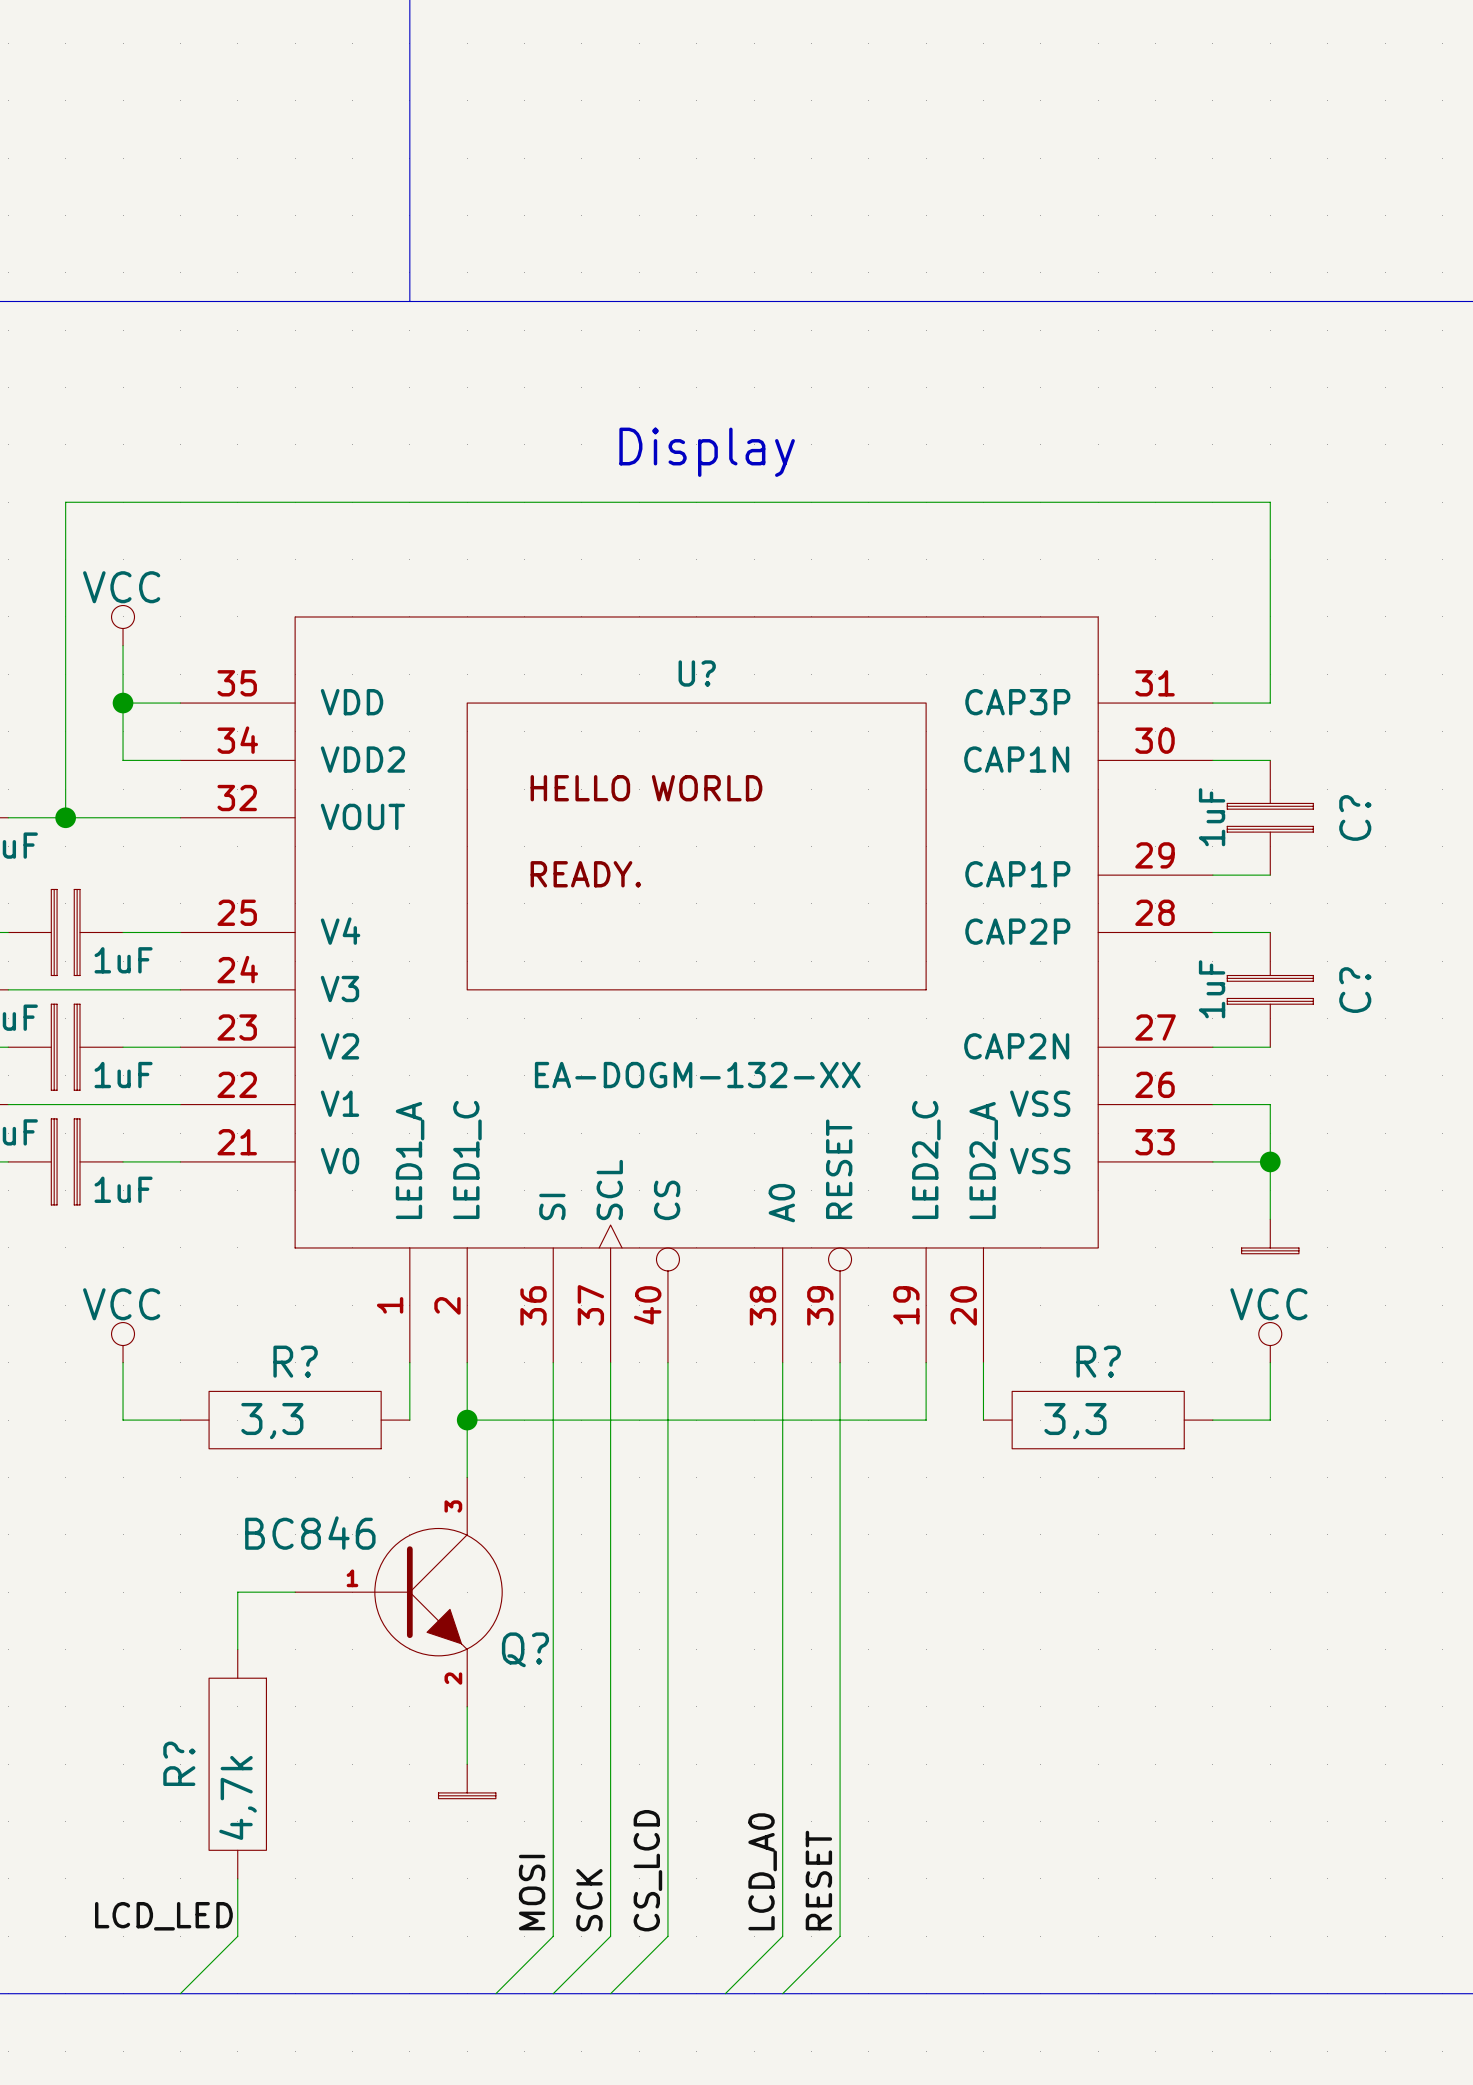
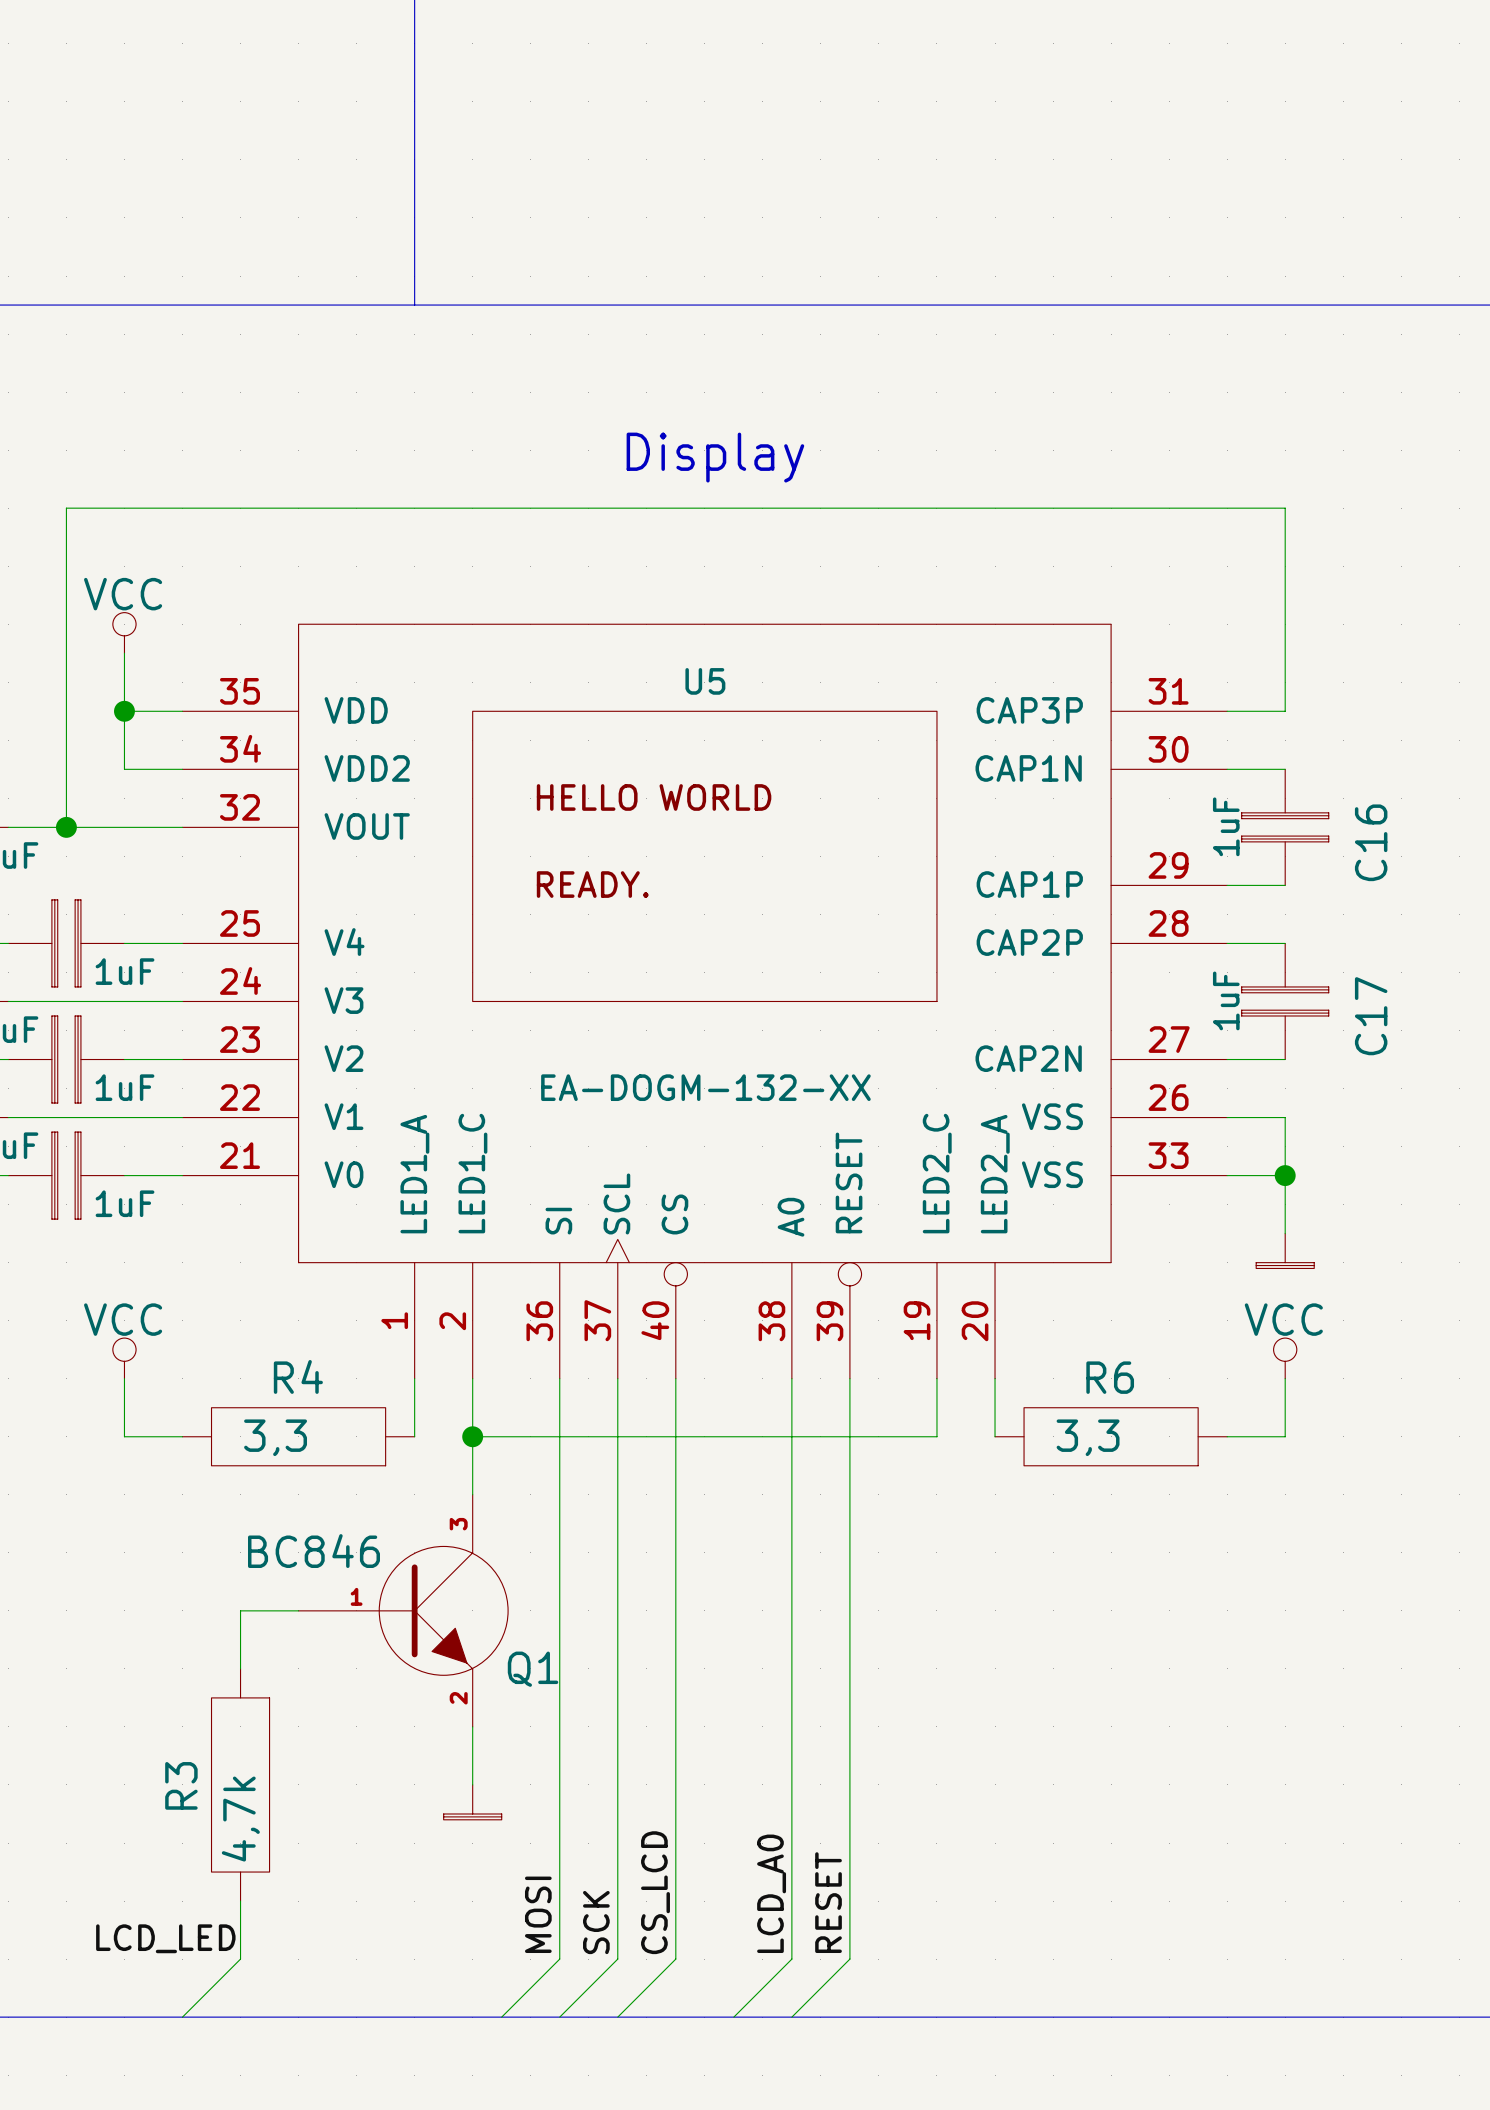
U? name: U? (697, 673) -> U5 (705, 681)
C? name: C? (1355, 817) -> C16 (1371, 842)
C? name: C? (1355, 990) -> C17 (1371, 1016)
R? name: R? (295, 1361) -> R4 (298, 1376)
R? name: R? (1098, 1361) -> R6 (1110, 1377)
Q? name: Q? (525, 1649) -> Q1 (533, 1669)
R? name: R? (179, 1763) -> R3 (181, 1785)

